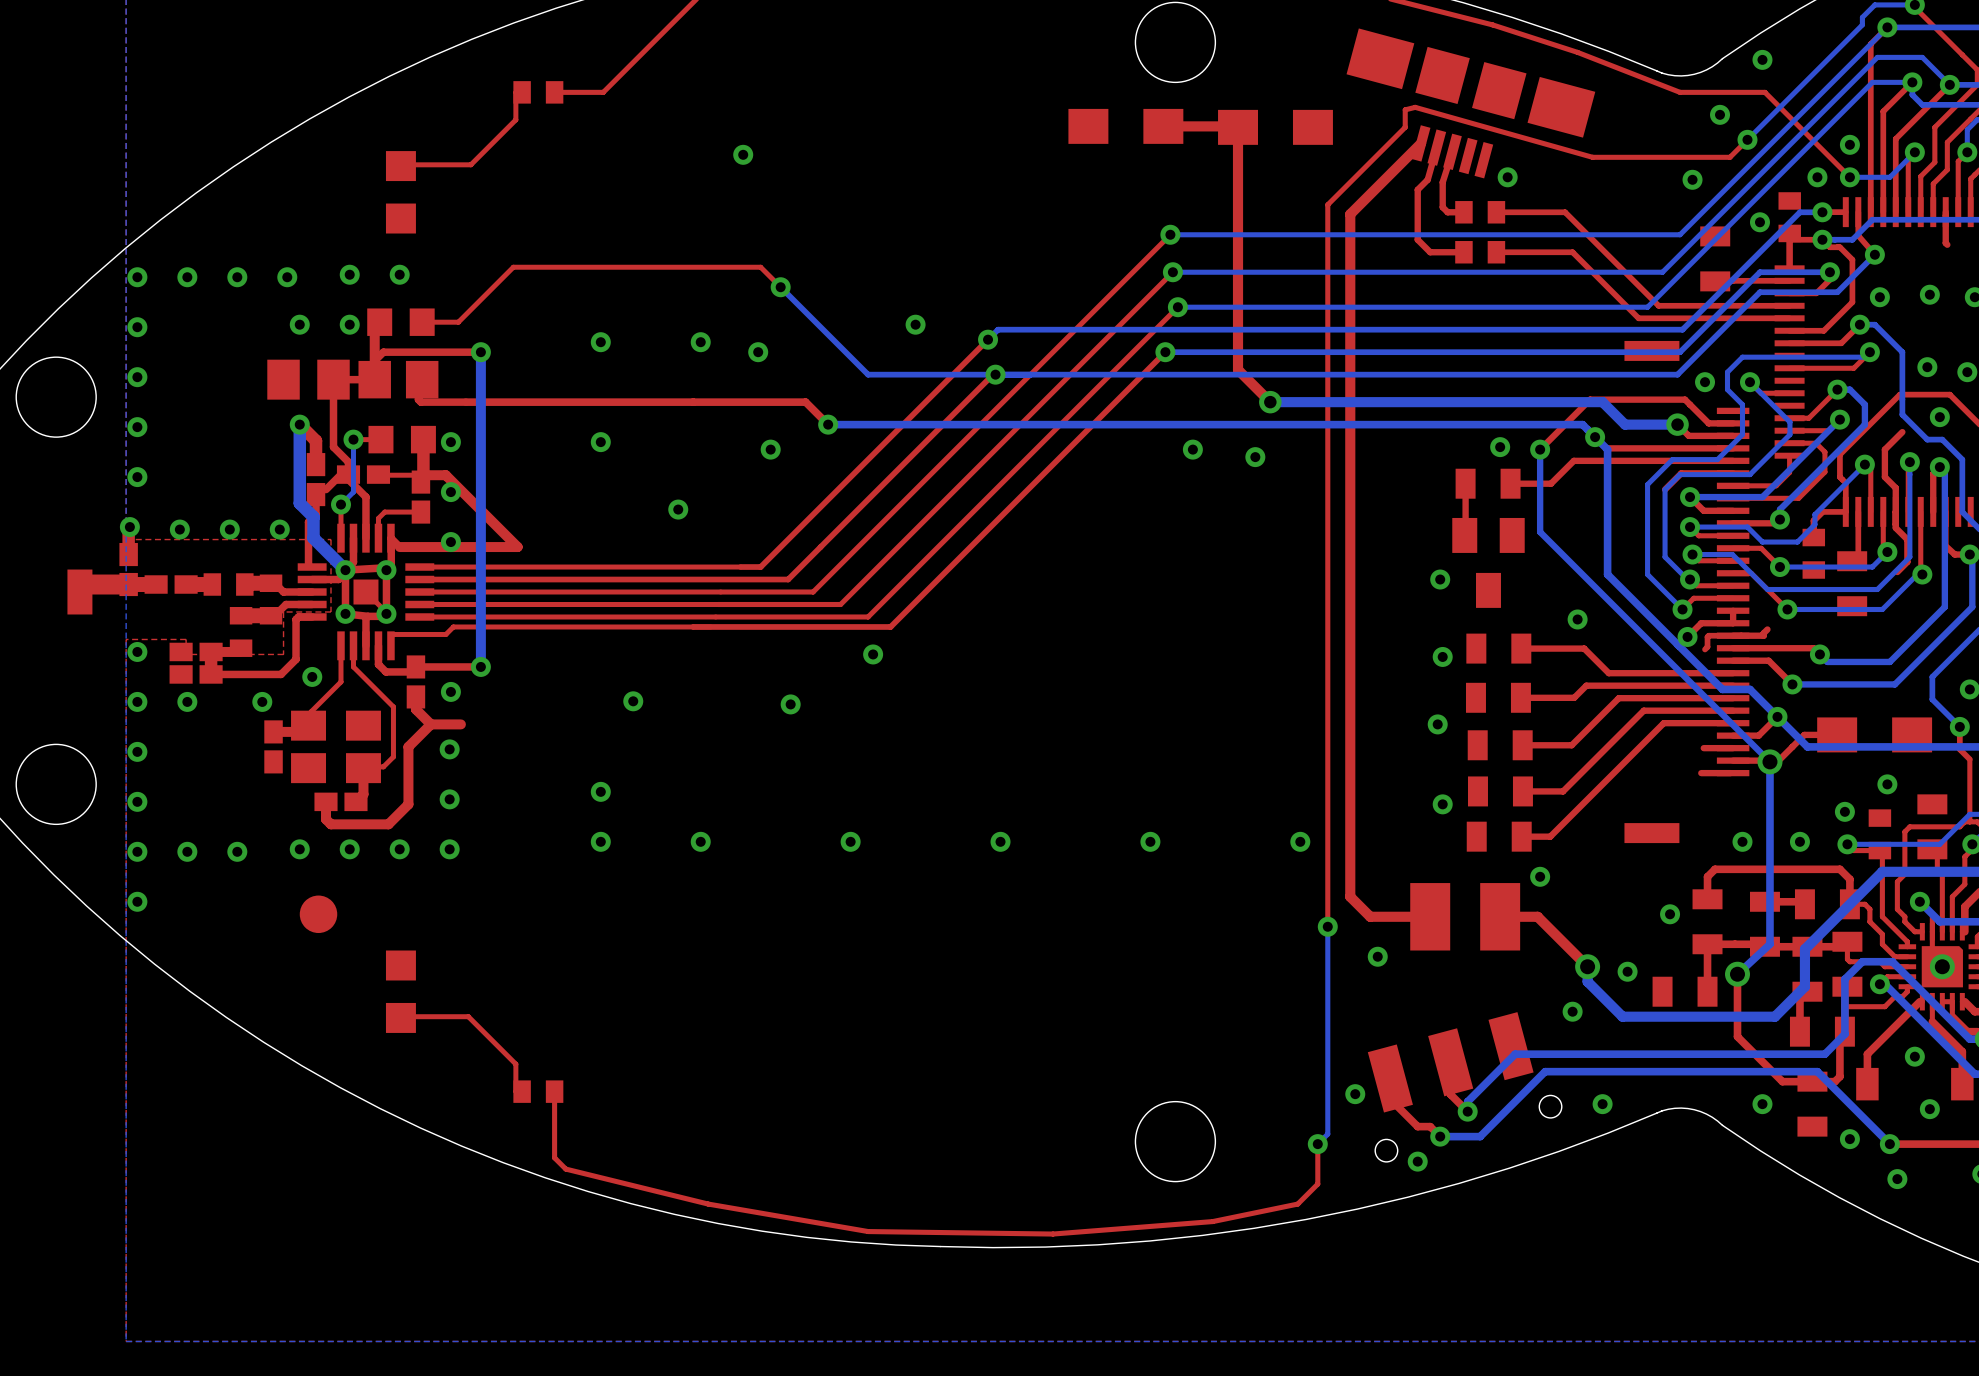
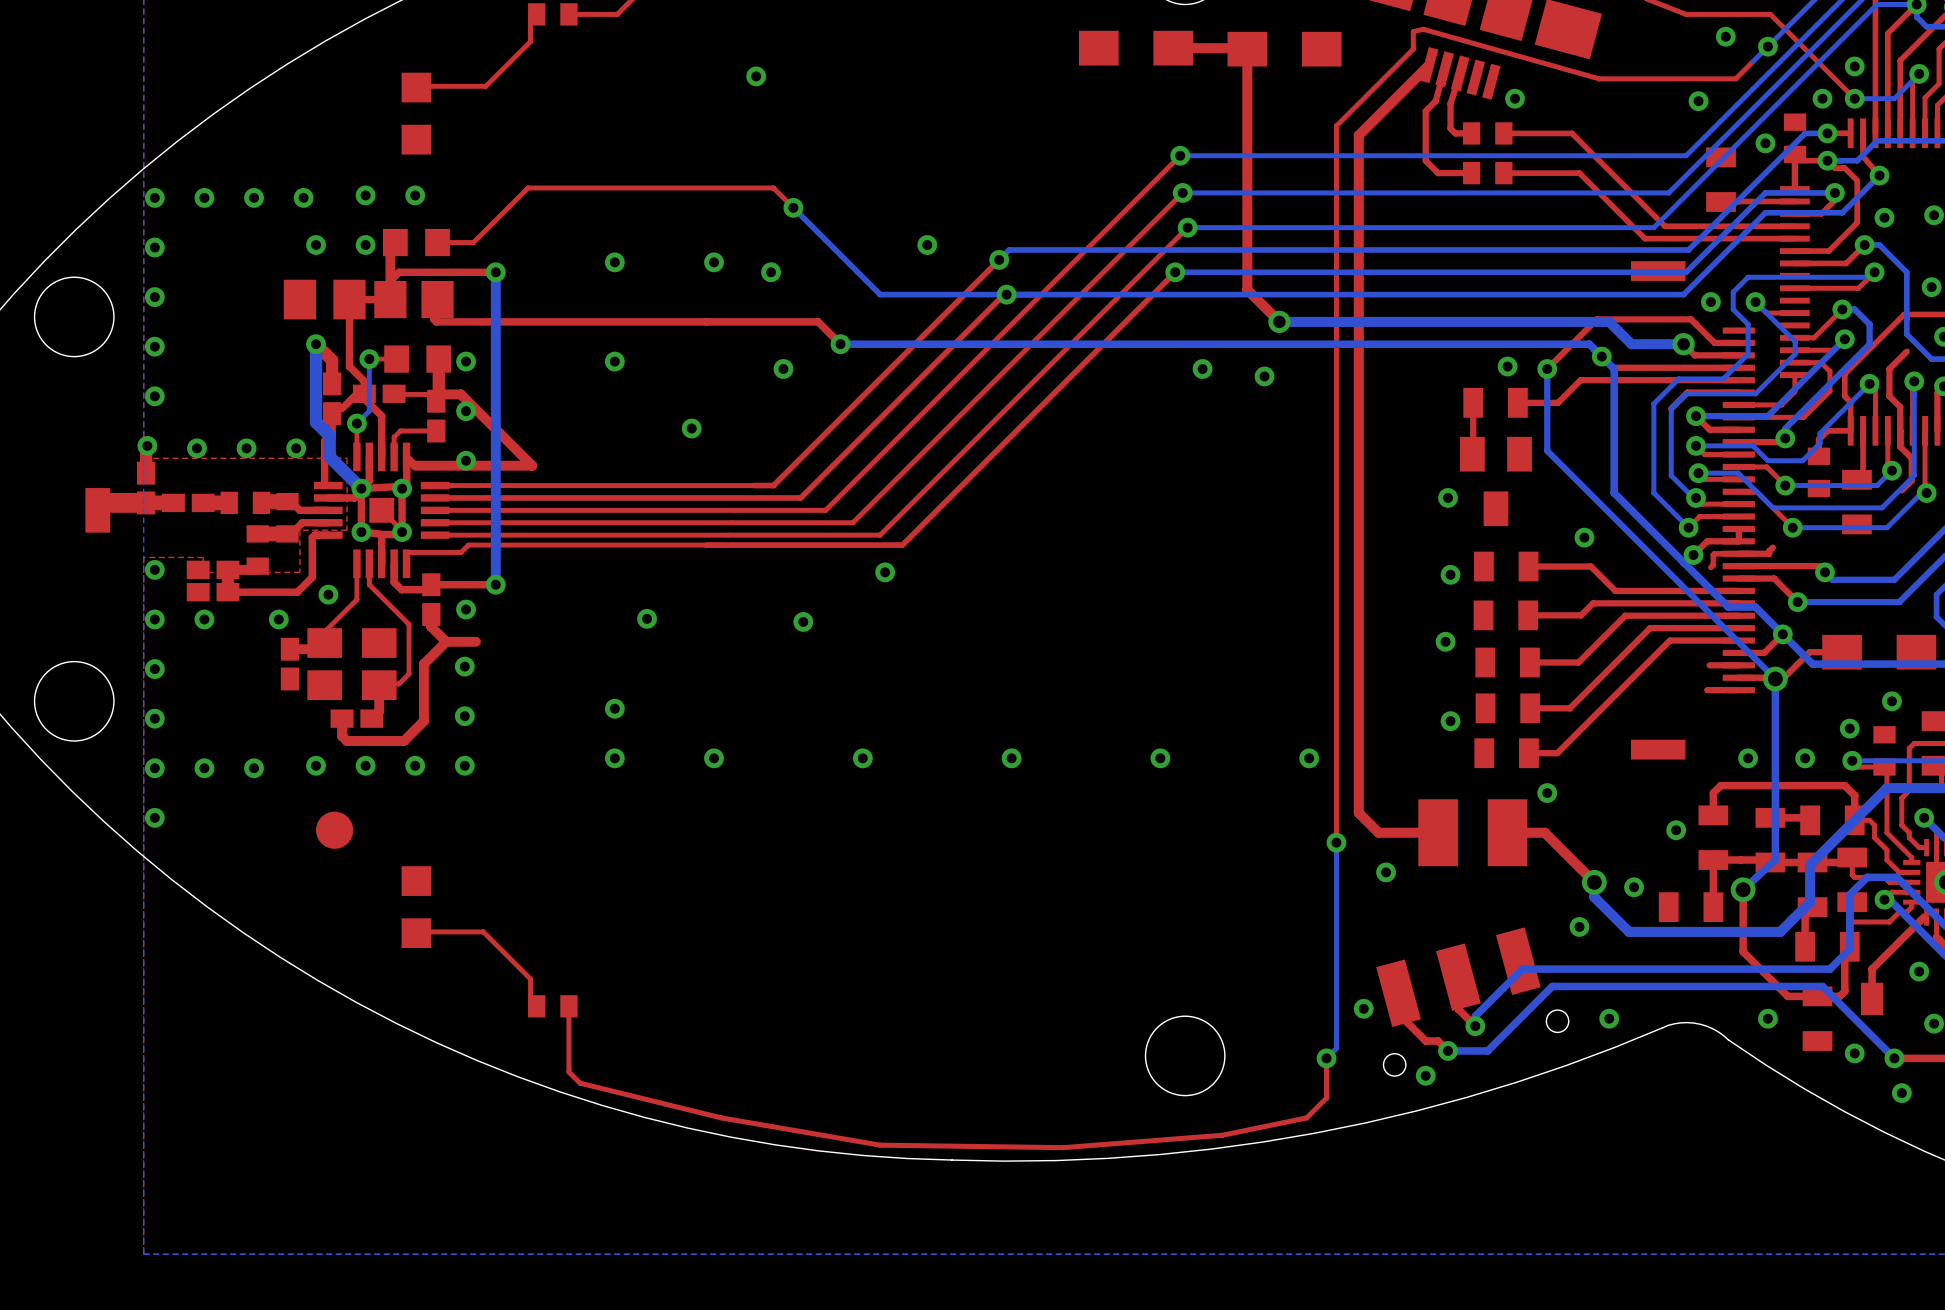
via position: (1747, 139) -> (1767, 46)

